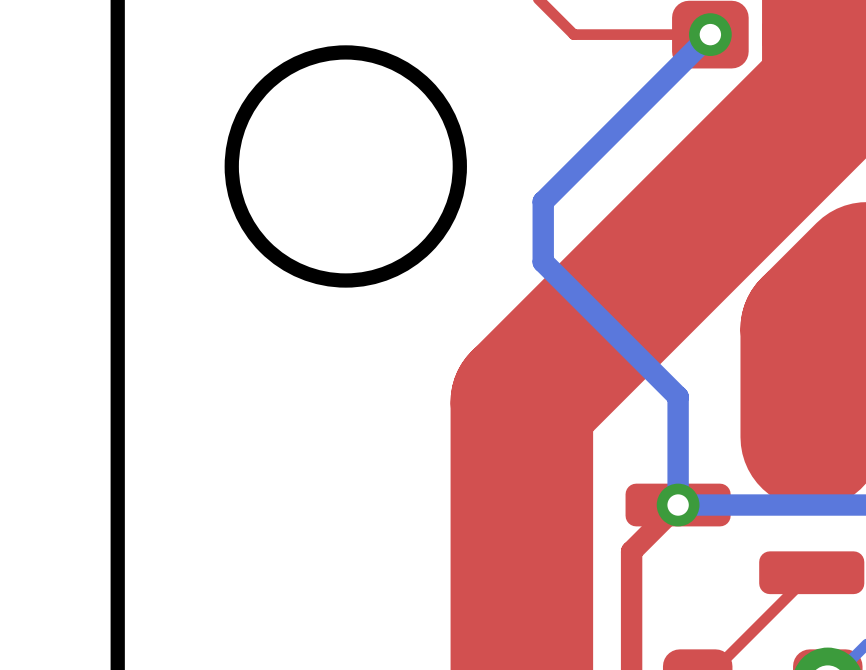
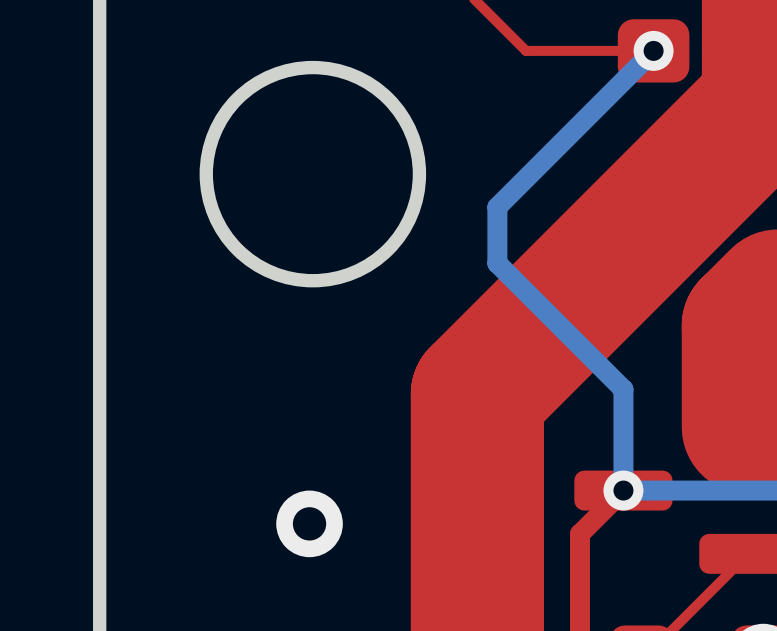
via: none -> (309, 523)

